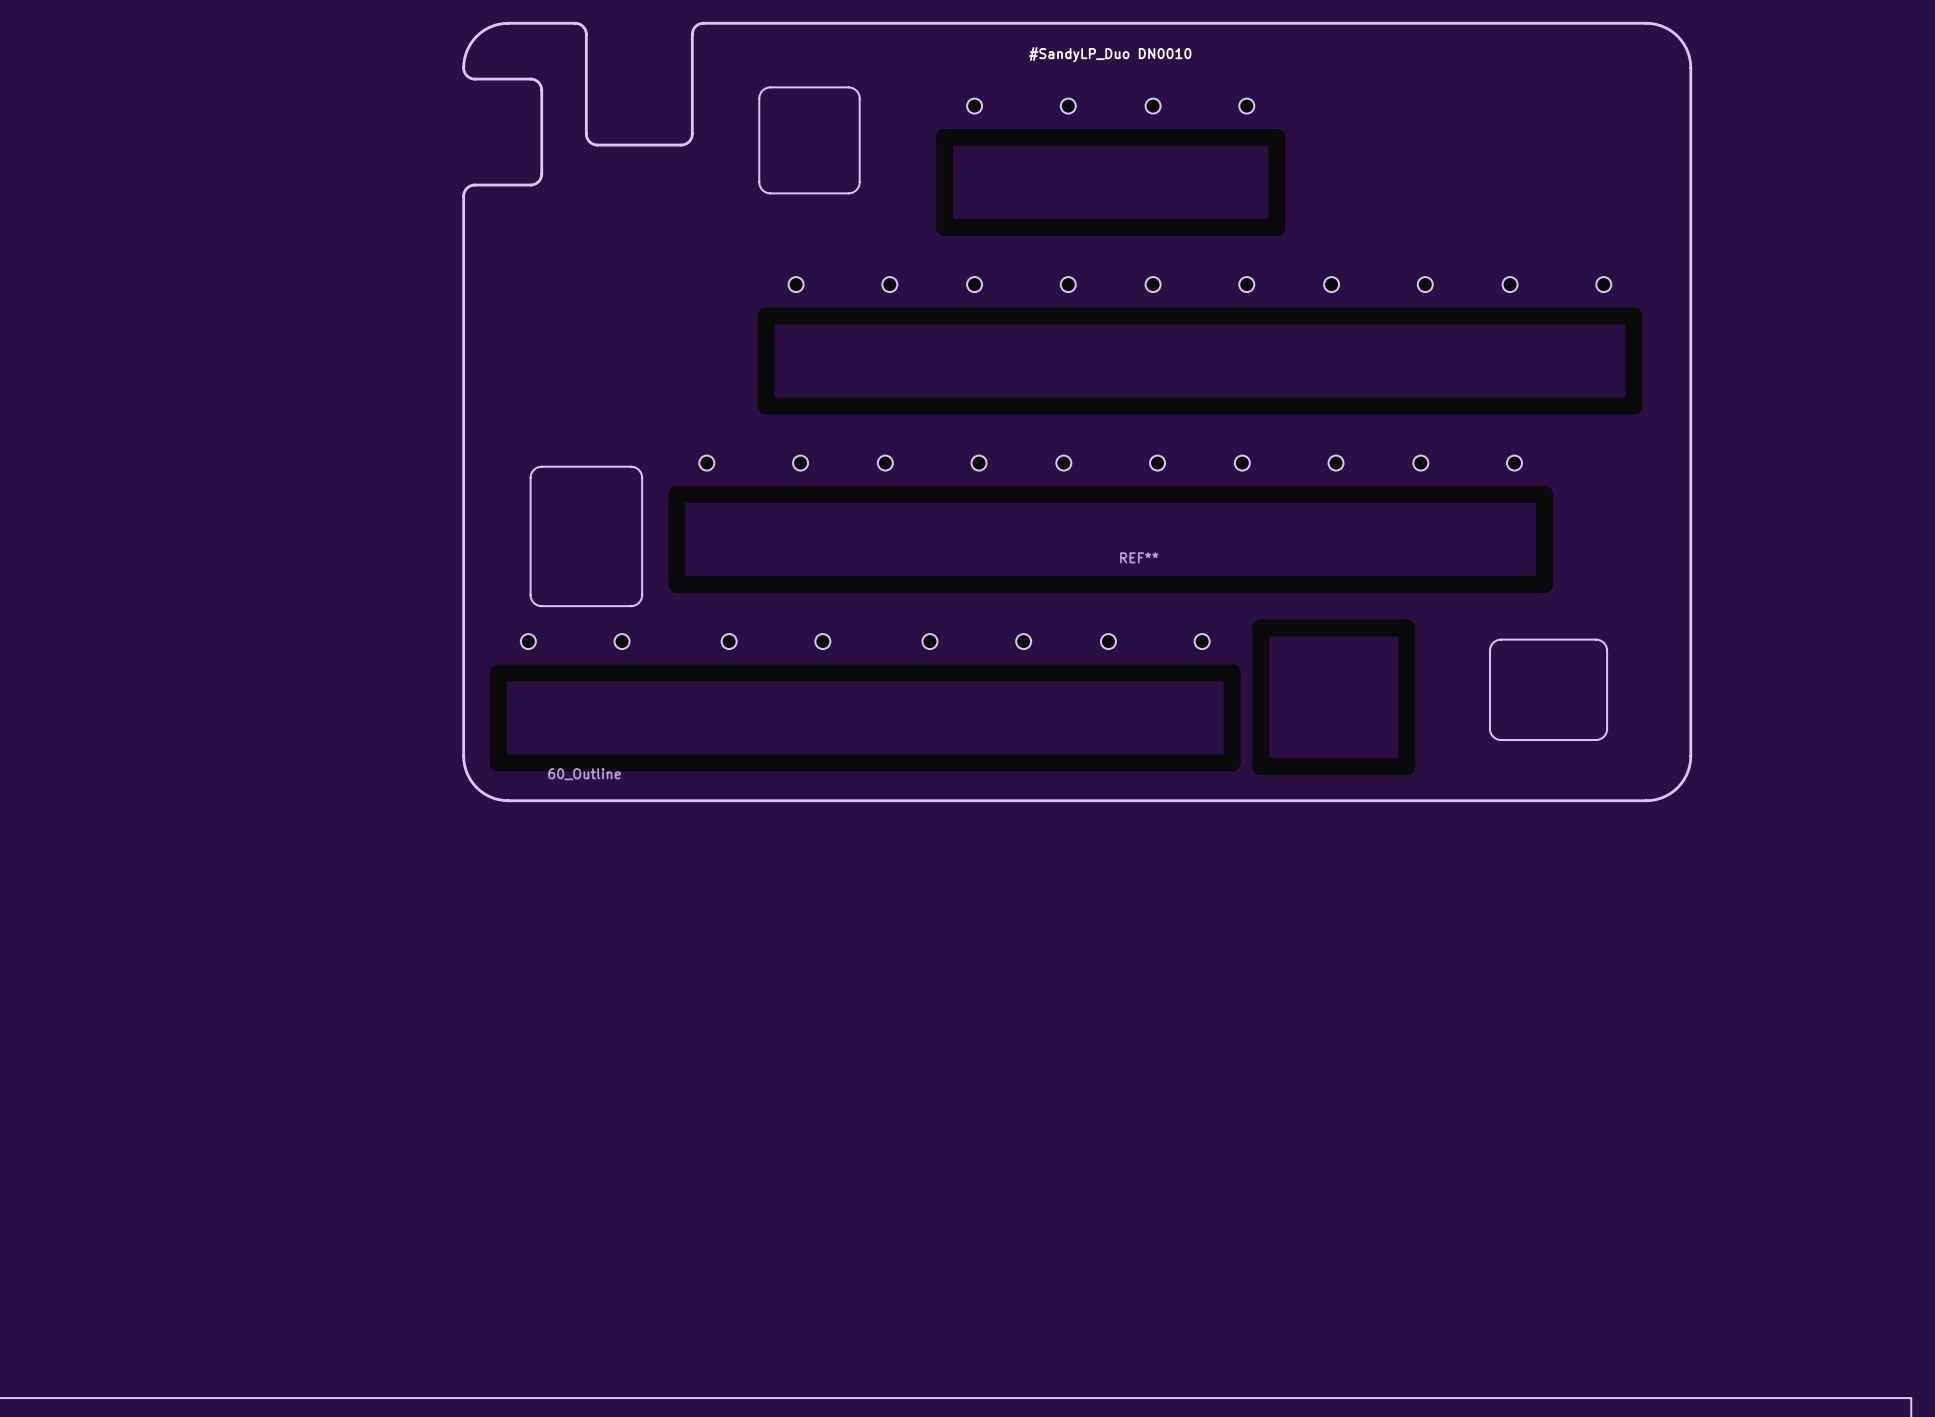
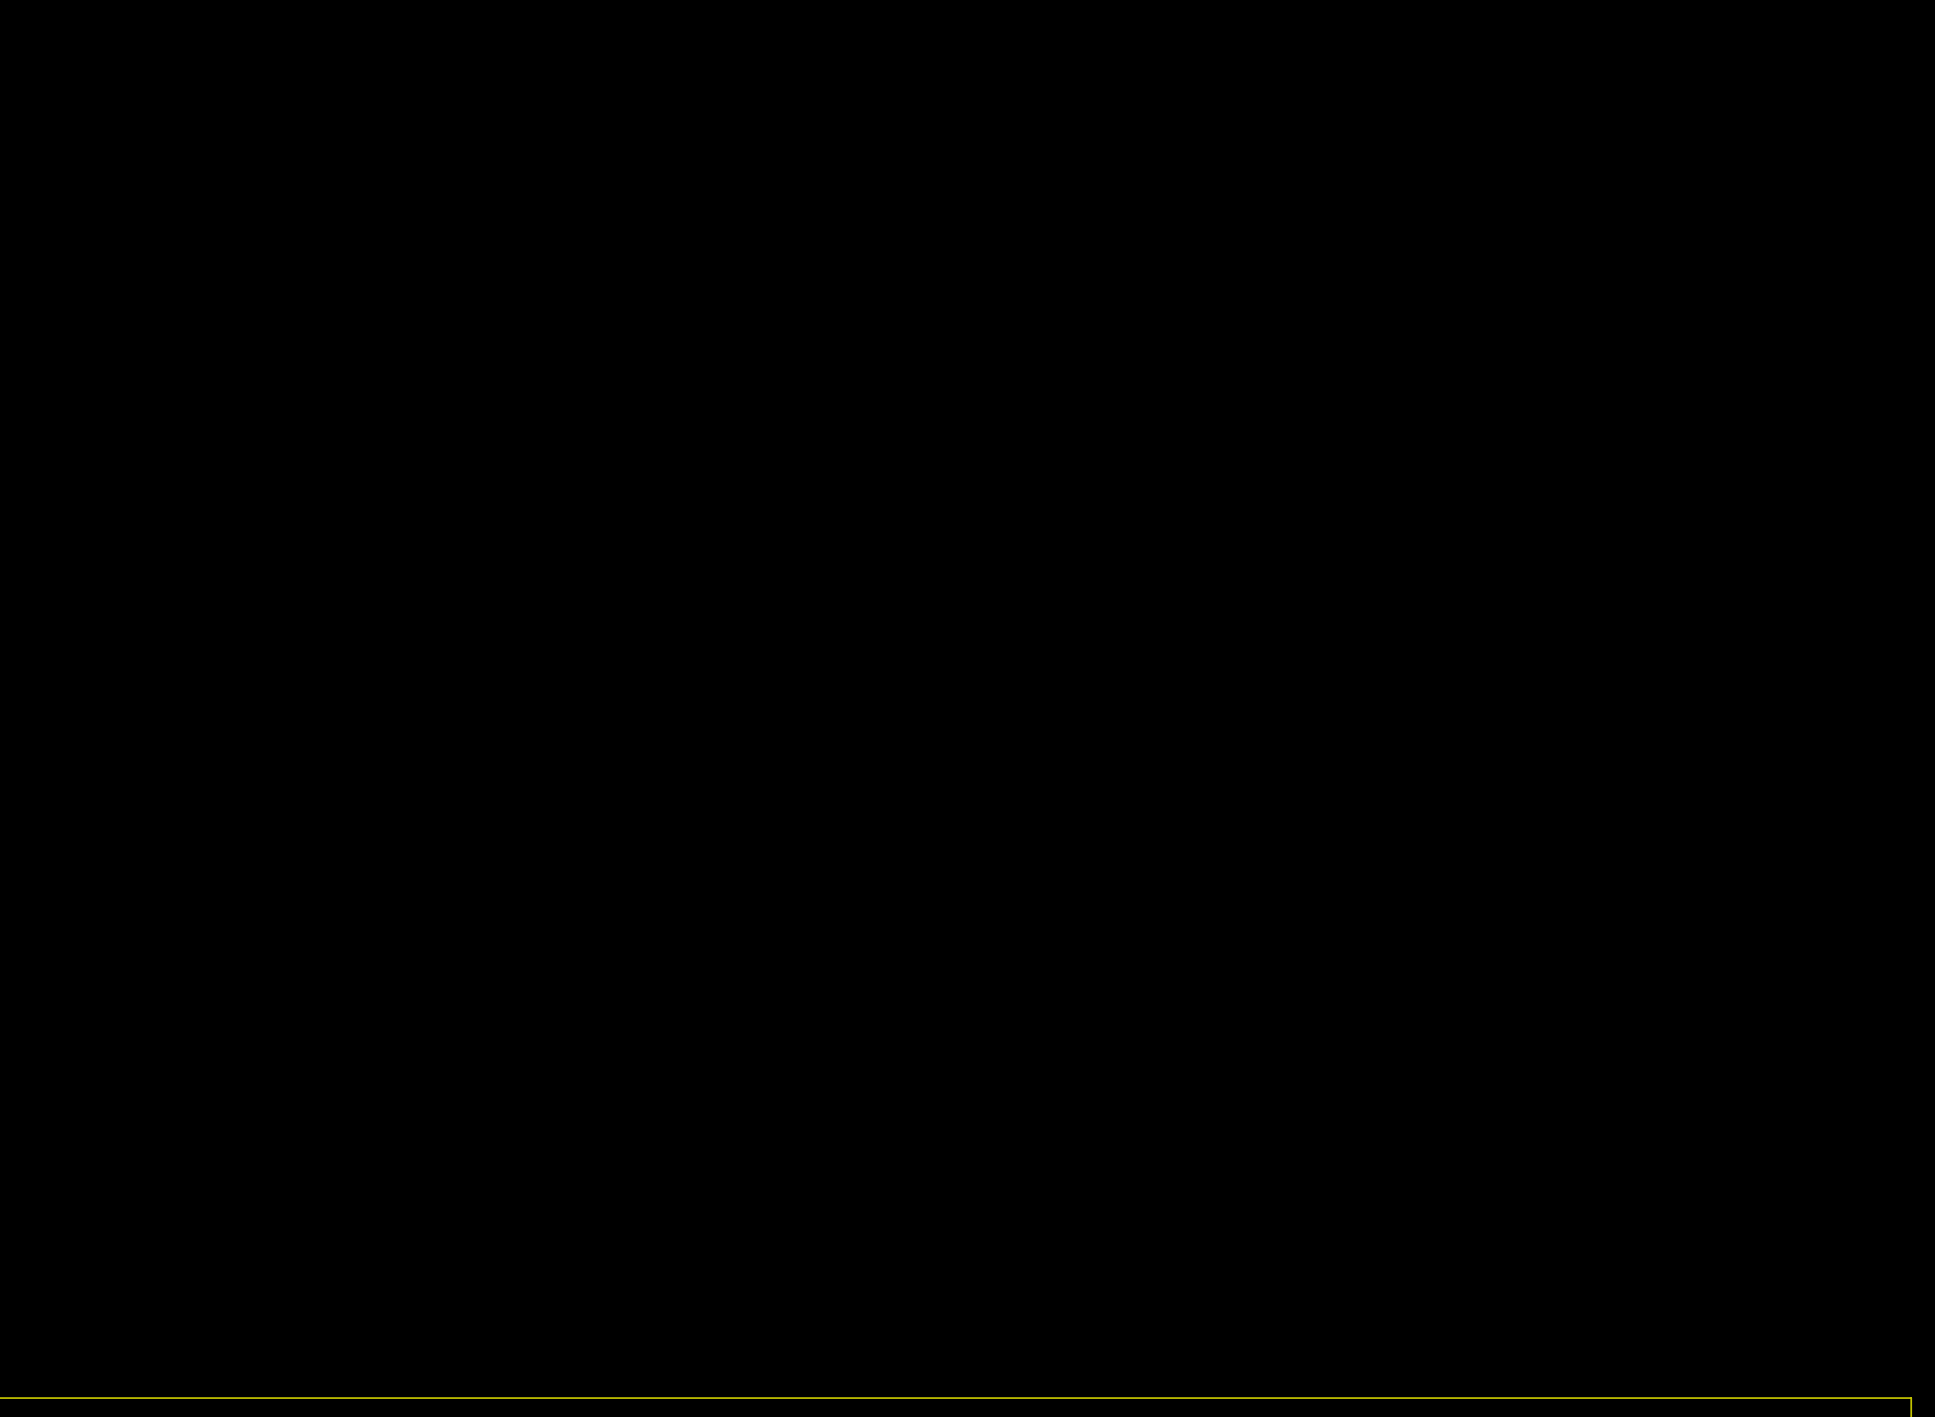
text: #SandyLP_Duo DN0010 (1110, 54) -> none
board edge: (848, 87) (770, 87) (761, 91) (759, 98) (759, 182) (763, 190) (770, 193) (848, 193) (857, 189) (859, 182) (859, 97) (856, 90) (848, 87) -> none
REF**: 60_Outline (1077, 412) -> none
board edge: (630, 466) (541, 466) (532, 471) (530, 477) (530, 595) (534, 603) (541, 606) (630, 606) (640, 600) (642, 595) (642, 476) (638, 469) (630, 466) -> none
board edge: (1595, 639) (1501, 639) (1493, 642) (1489, 650) (1489, 728) (1493, 736) (1501, 740) (1595, 740) (1603, 736) (1607, 728) (1607, 649) (1603, 642) (1595, 639) -> none

